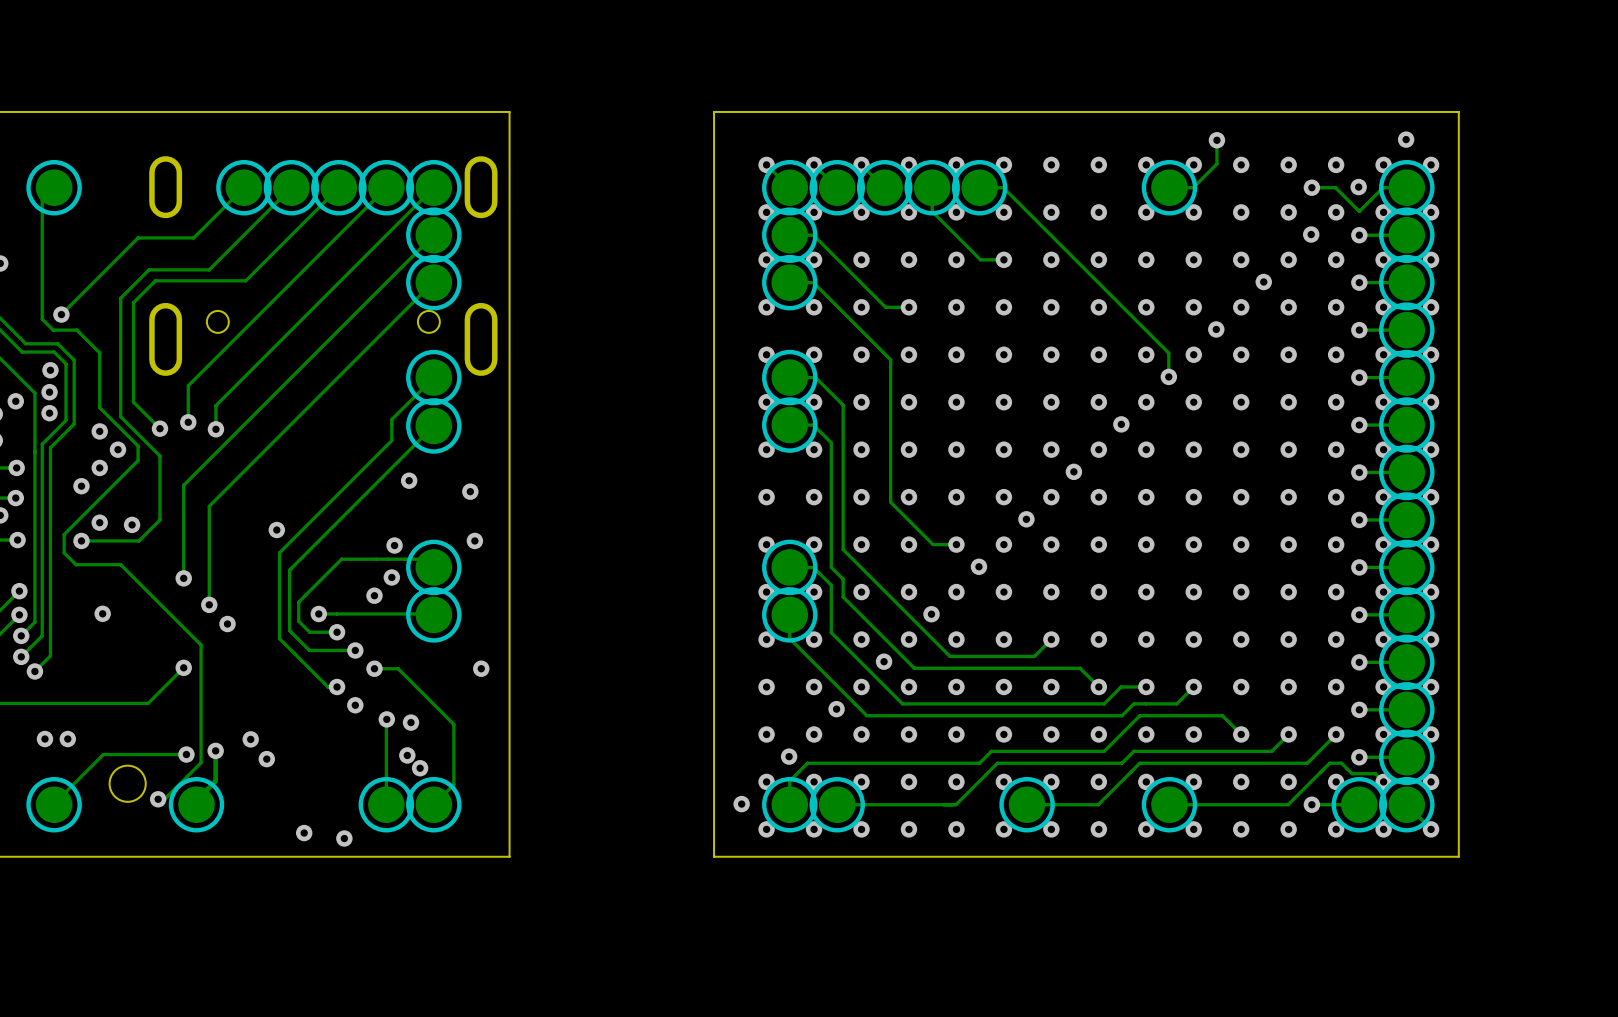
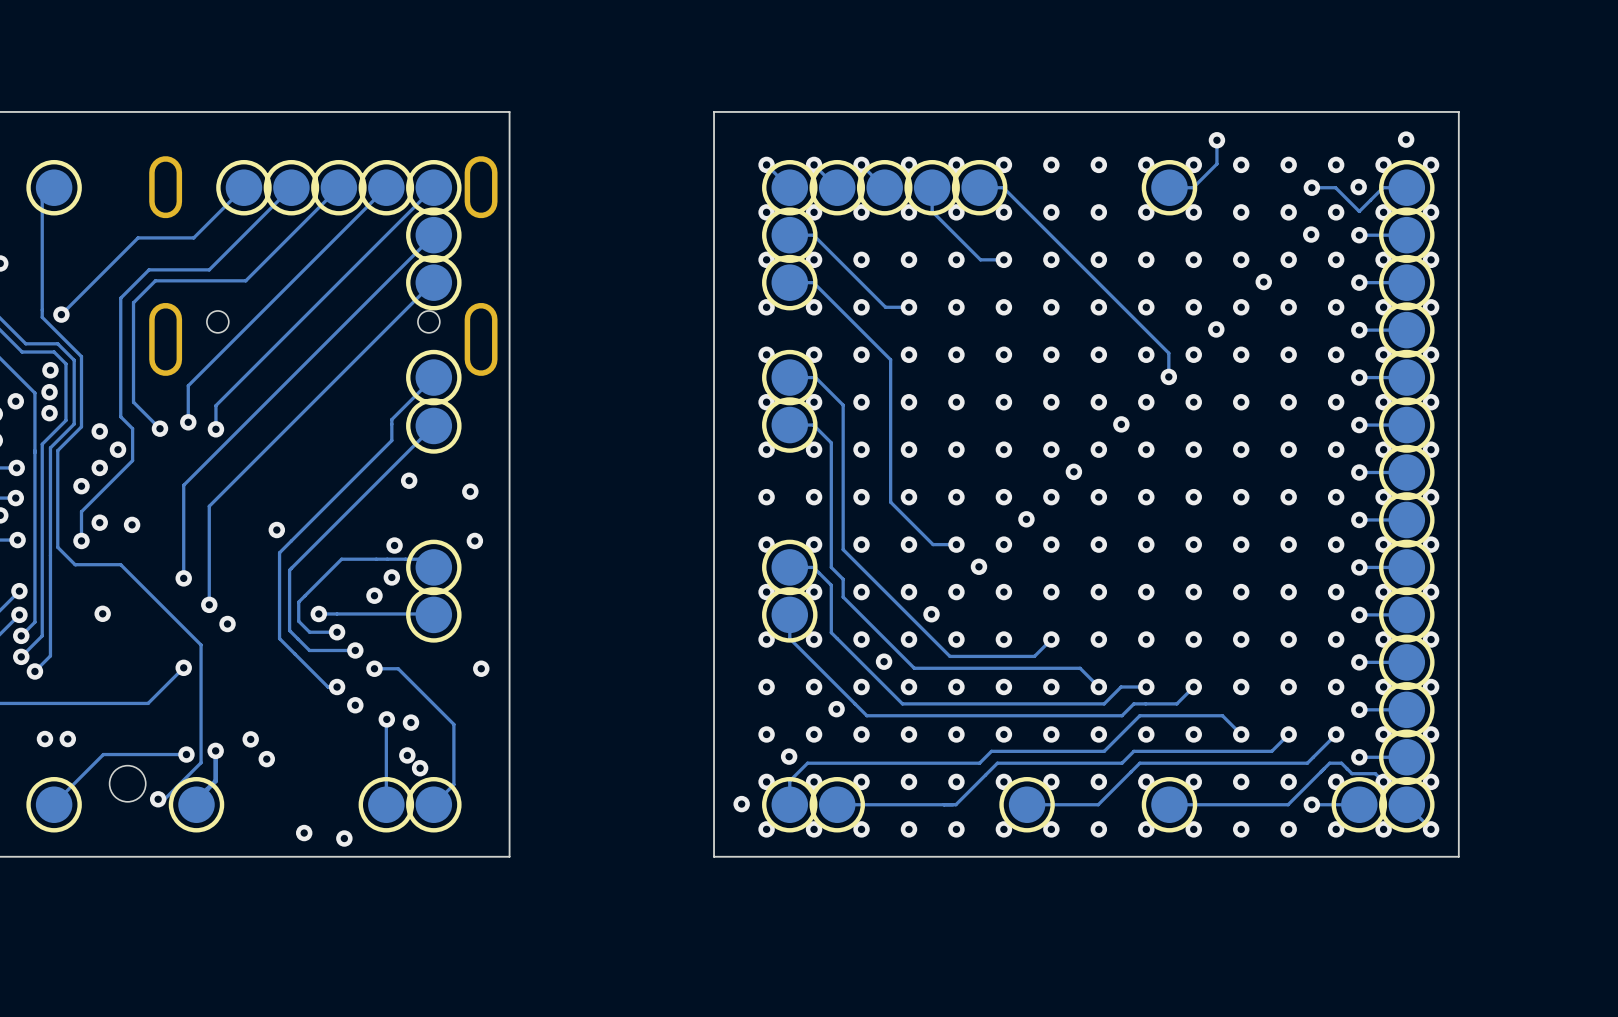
track: (42, 317) (53, 330) (76, 330) (99, 352) (99, 407) (138, 446) (138, 460) (64, 534) (64, 552) (76, 564) -> (42, 317) (81, 356) (81, 426) (57, 450) (57, 547) (76, 564)
track: (132, 428) (159, 456) (159, 519) (138, 540) (81, 540) -> (132, 428) (132, 460) (81, 511) (81, 540)

